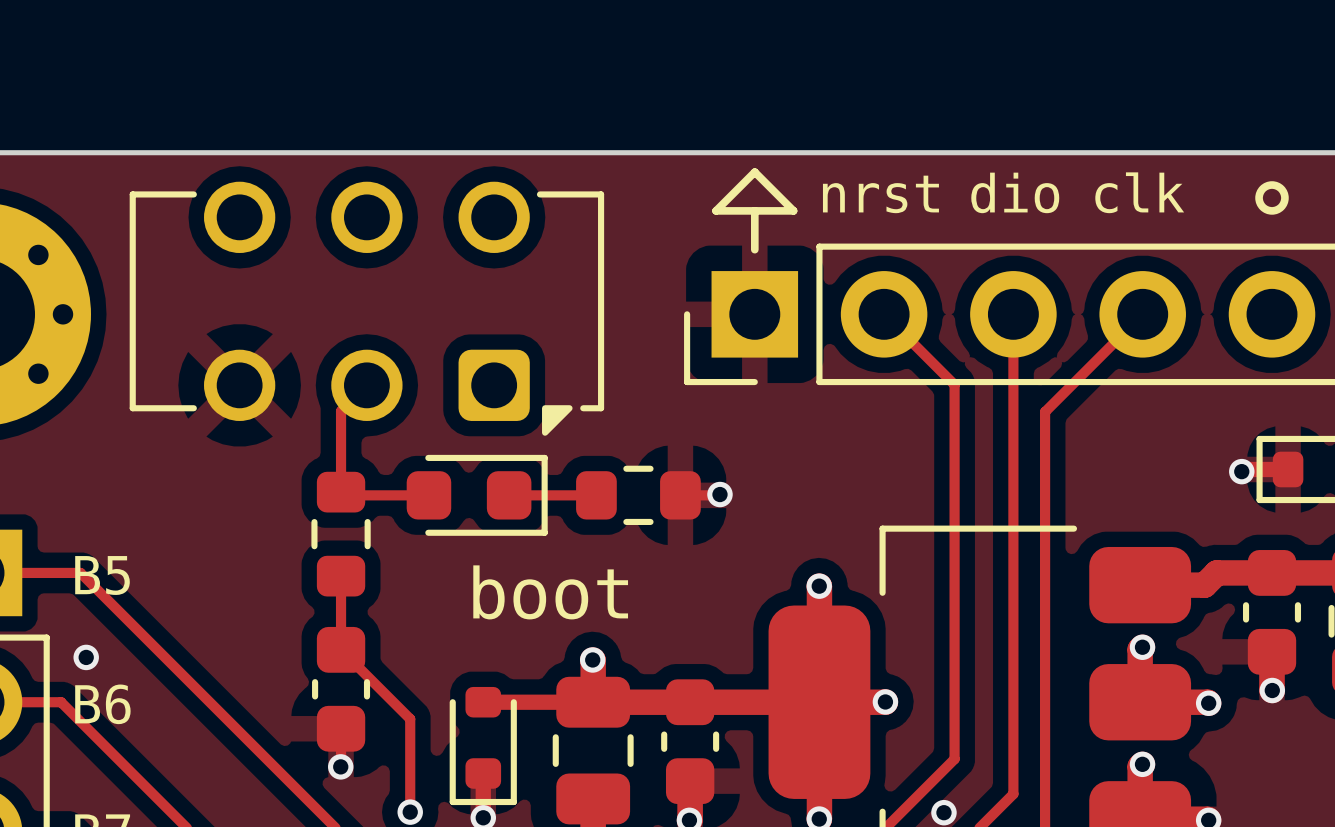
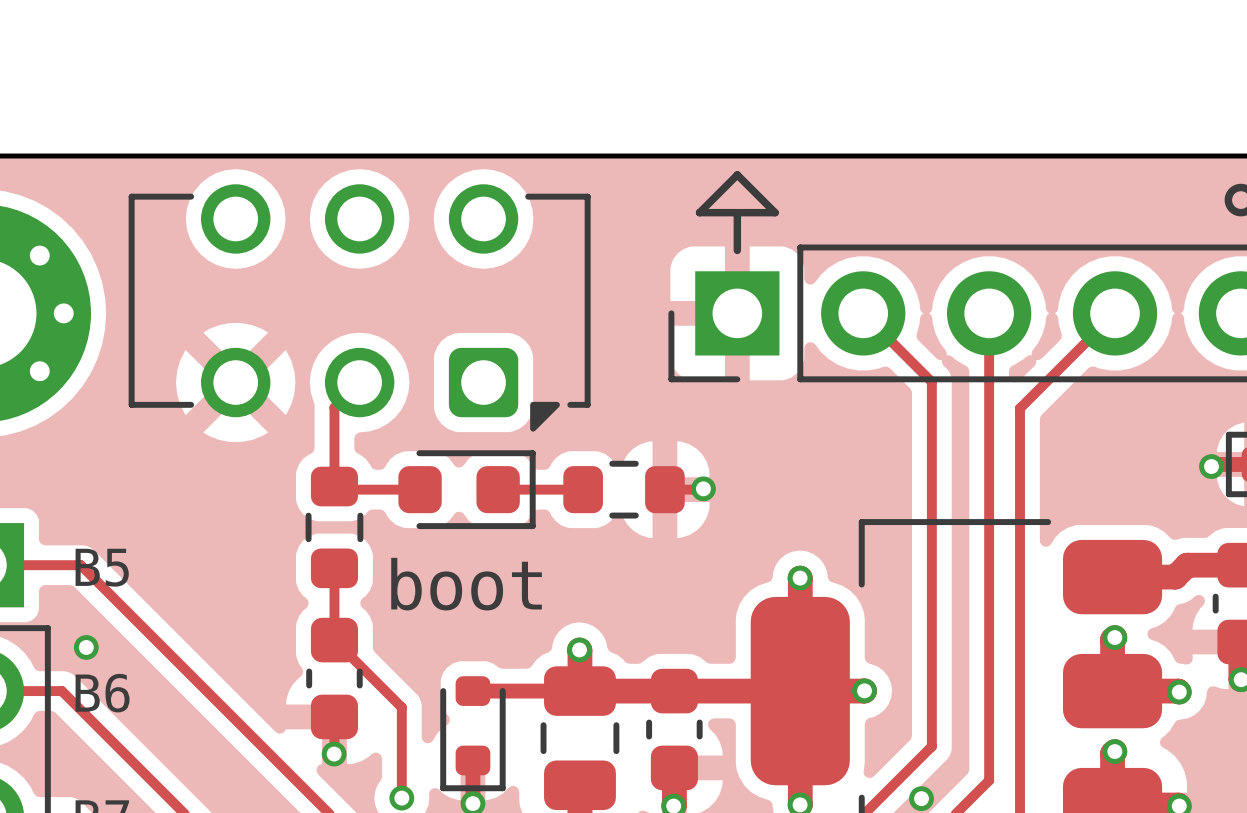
text: dio (1015, 192) -> none
text: clk (1139, 192) -> none
text: nrst (880, 194) -> none
text position: boot (550, 592) -> boot (466, 584)

